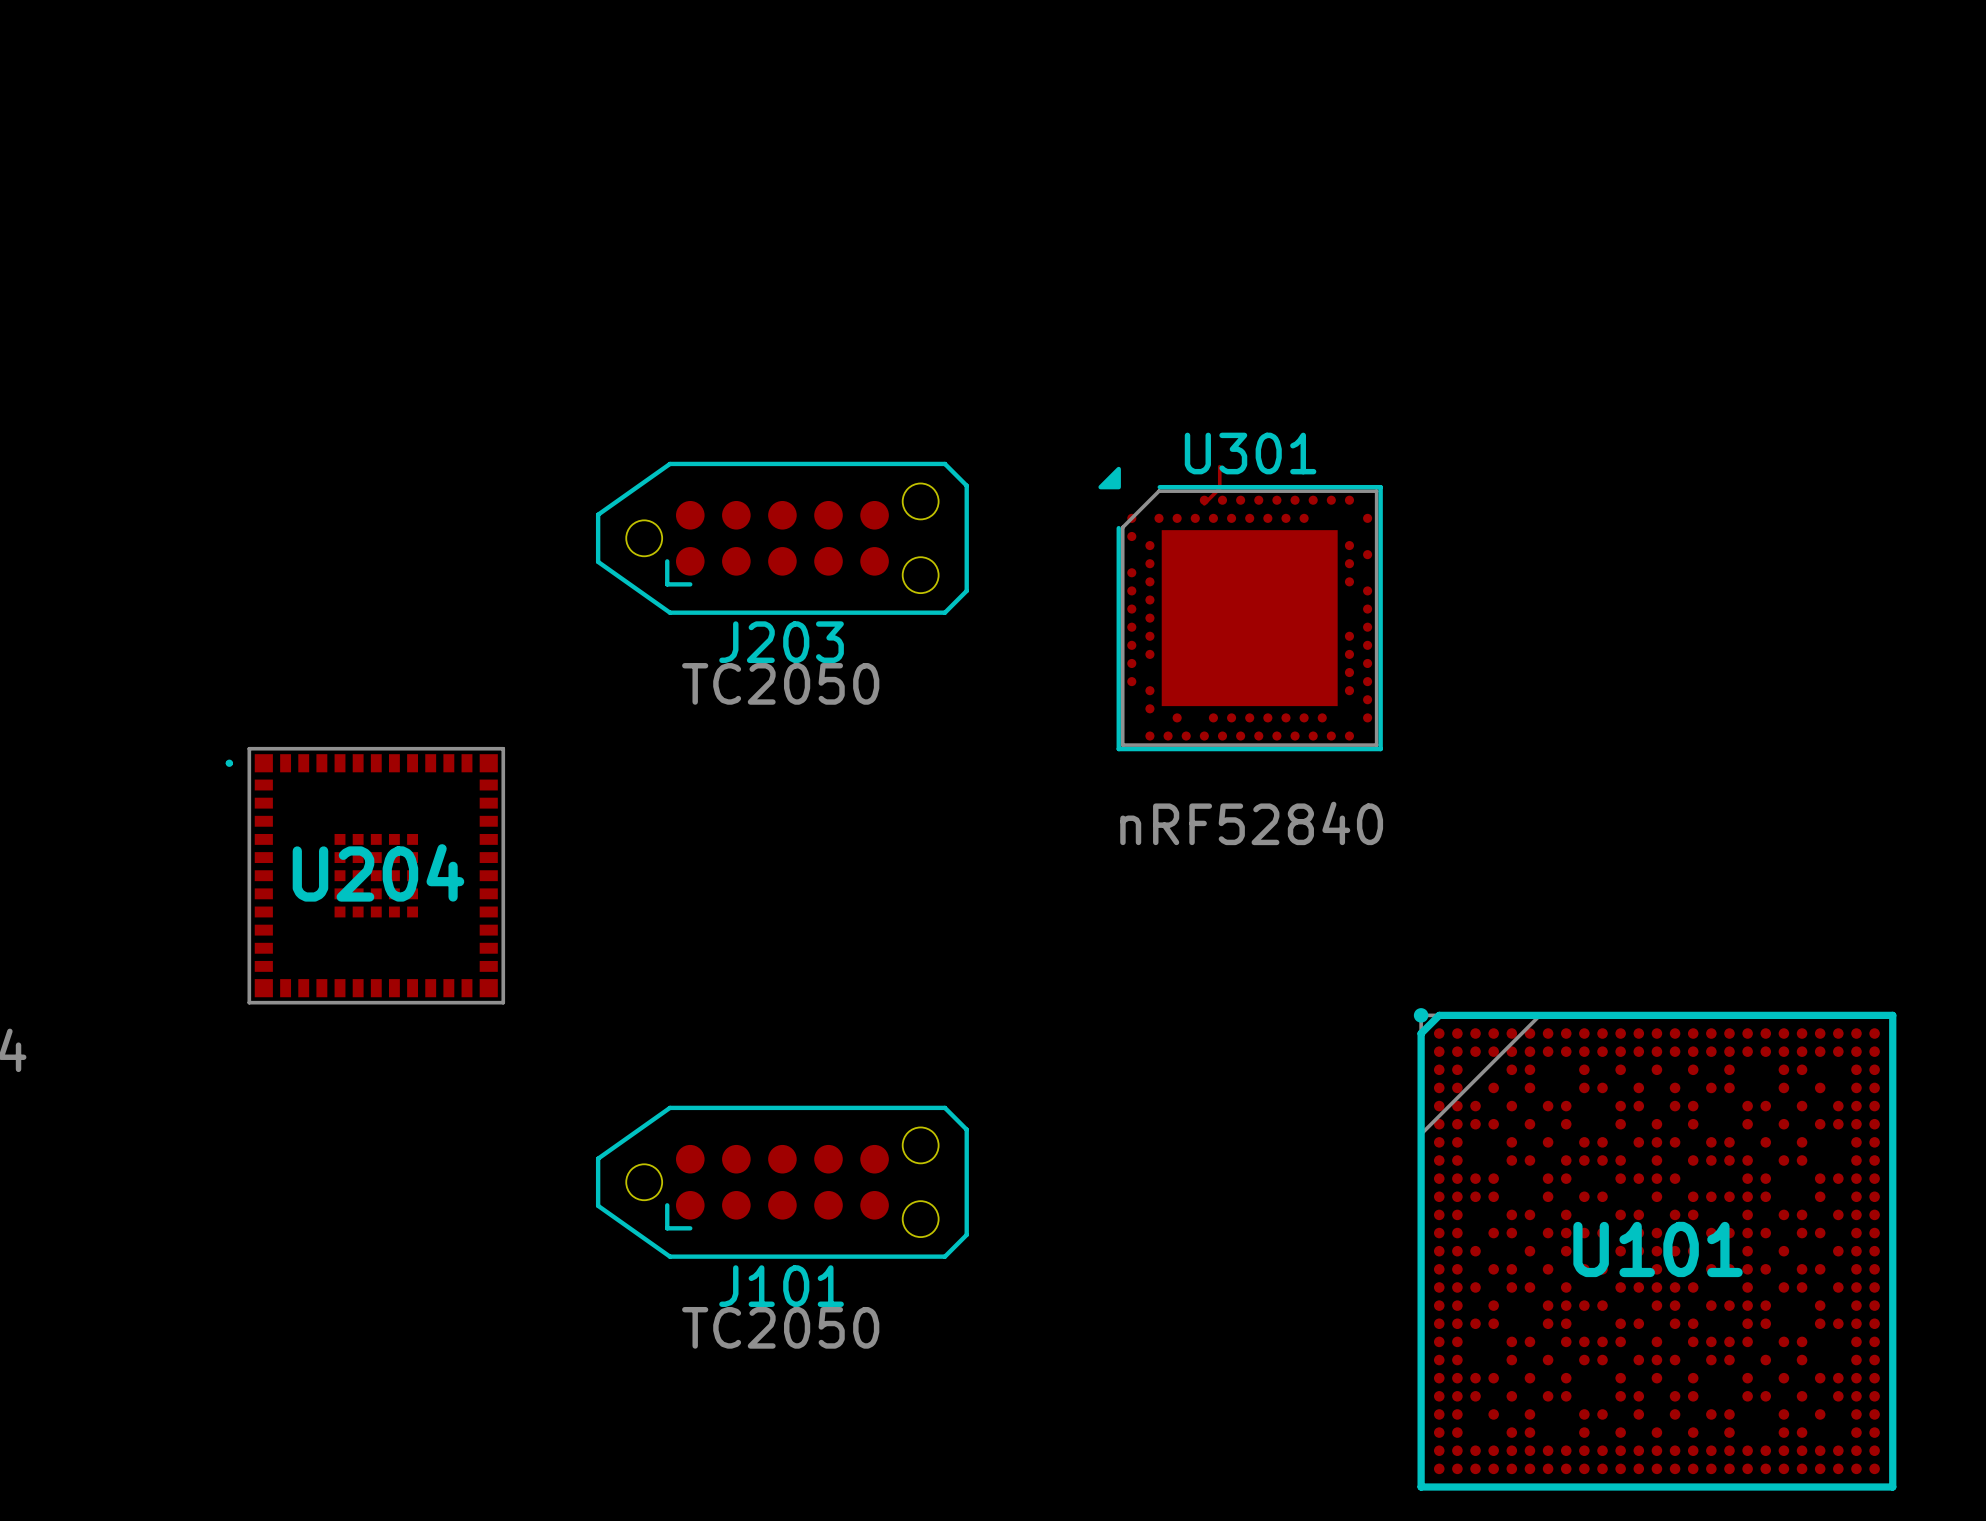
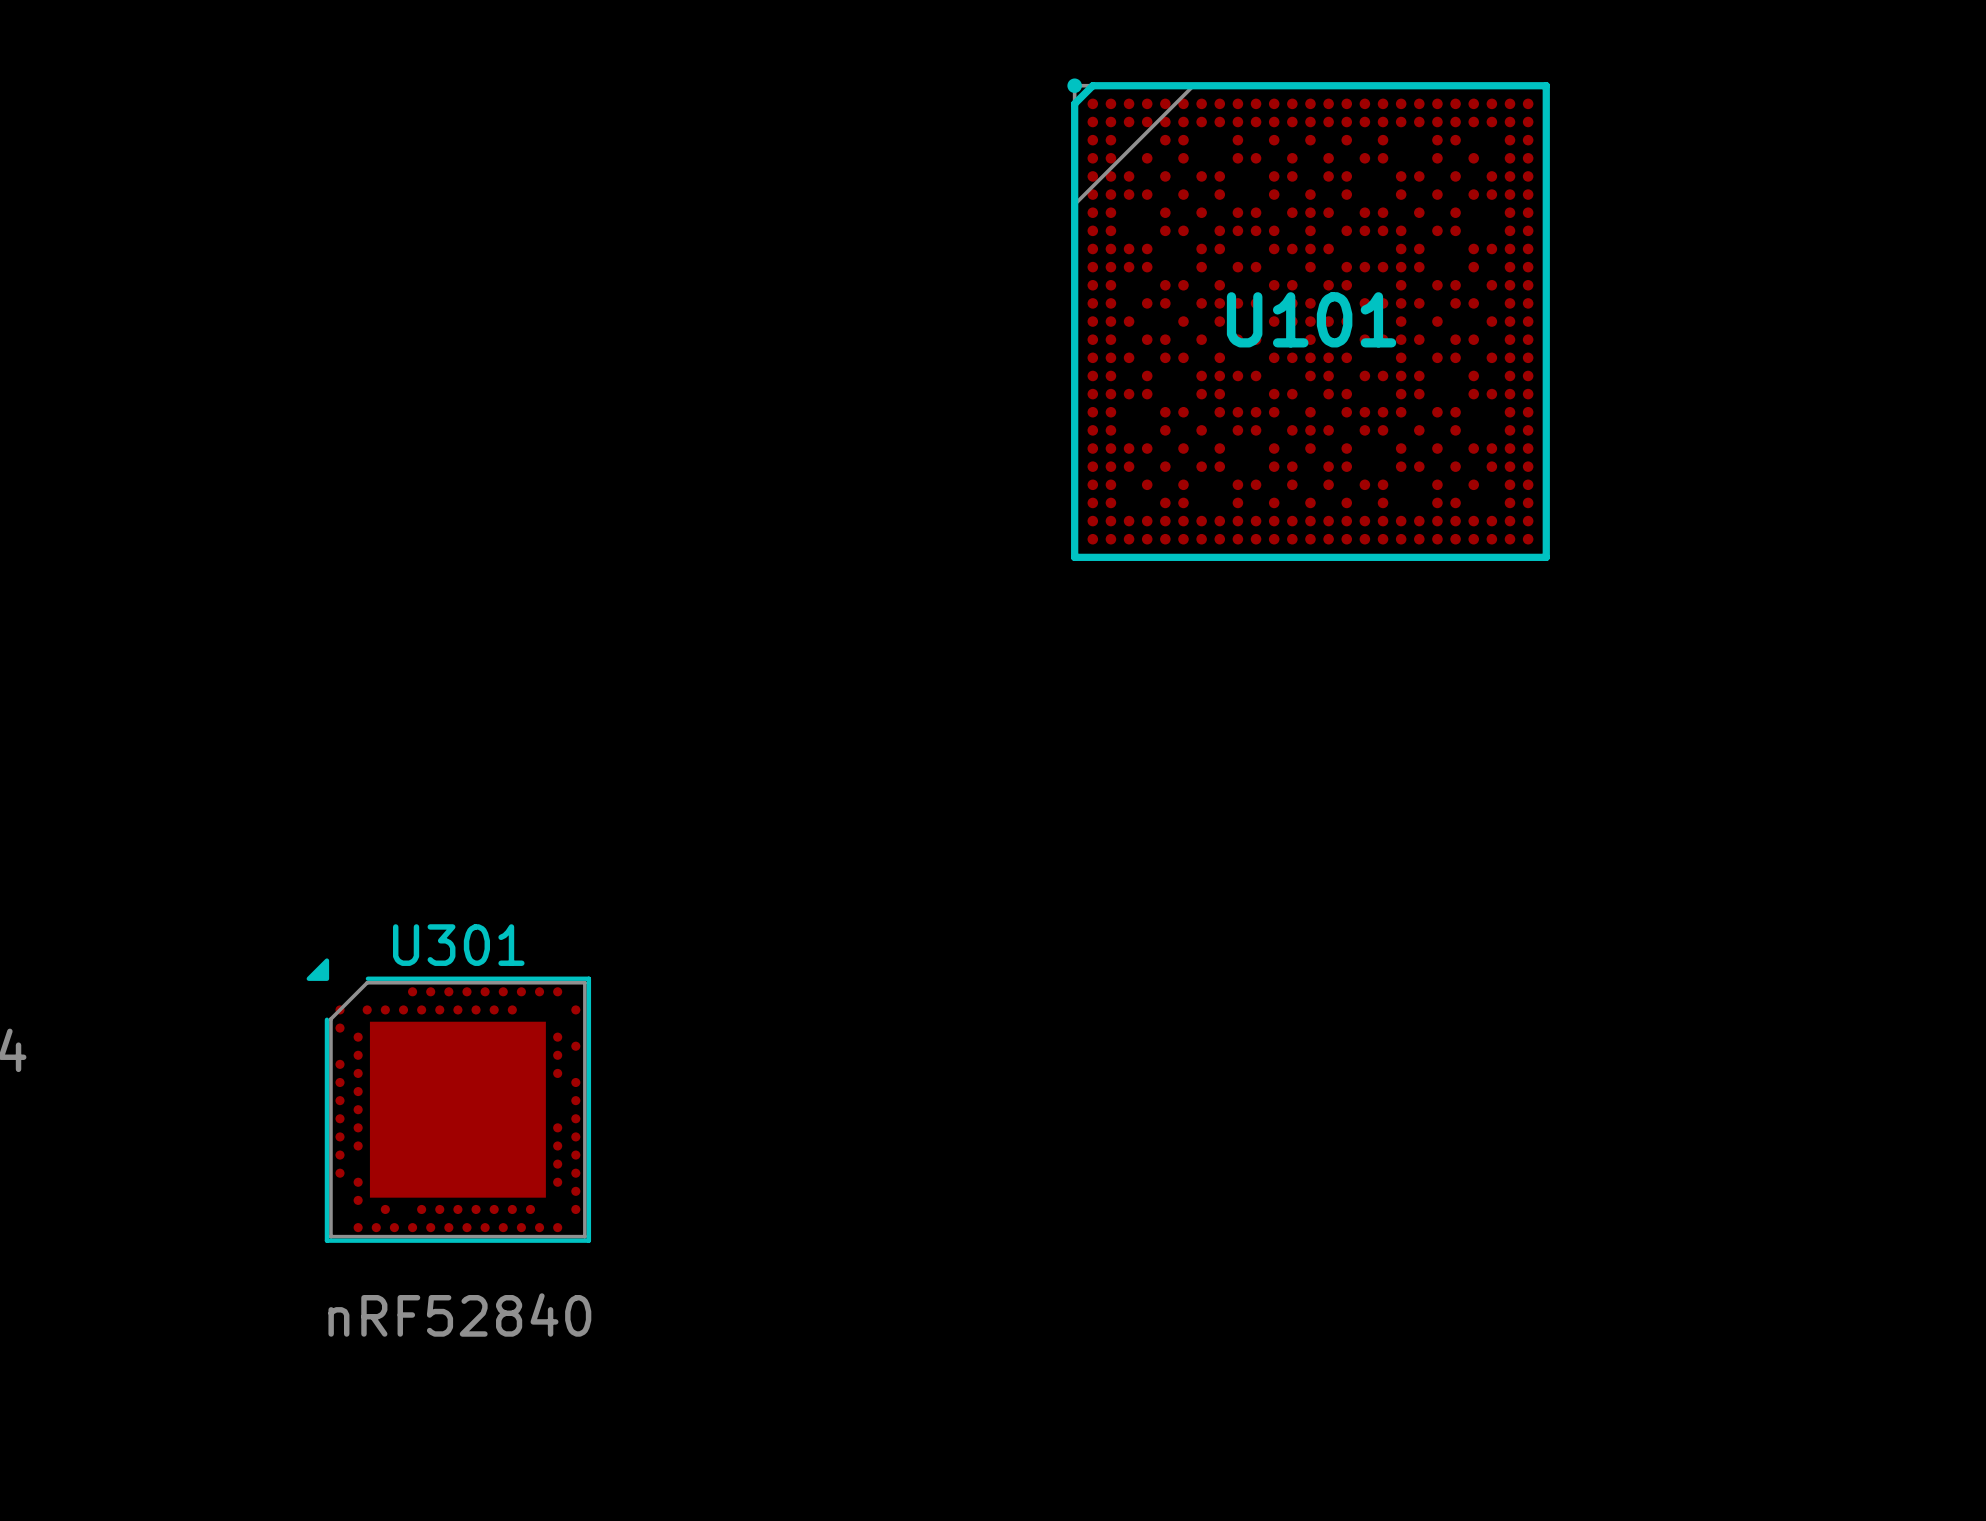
track: (1219, 466) (1219, 488) (1204, 503) -> none
J203: TC2050 (782, 538) -> none
U301 position: (1240, 609) -> (448, 1100)
U204: (365, 875) -> none
J101: TC2050 (782, 1182) -> none
U101 position: (1655, 1249) -> (1308, 319)

